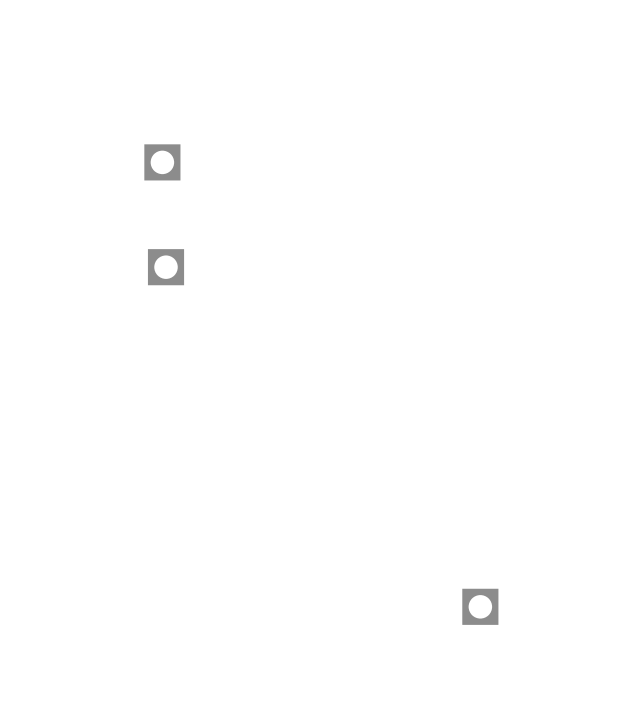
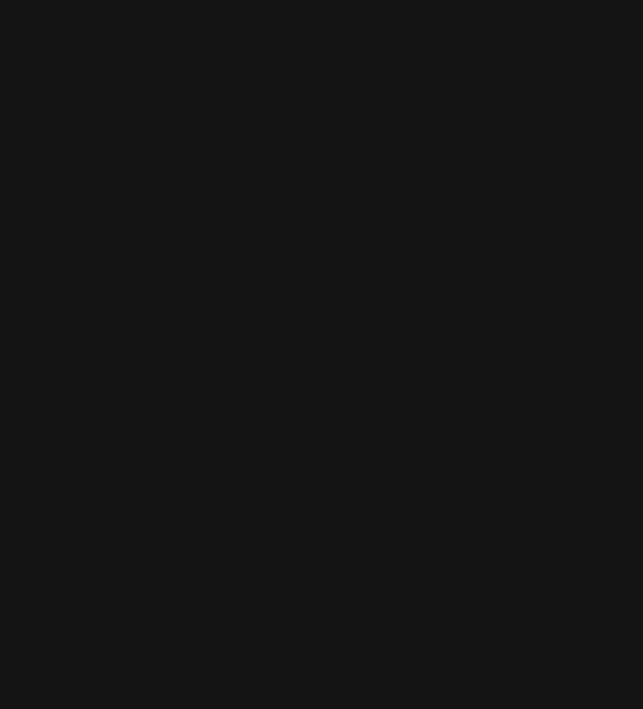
part: (162, 162) -> none
part: (166, 267) -> none
part: (480, 606) -> none

